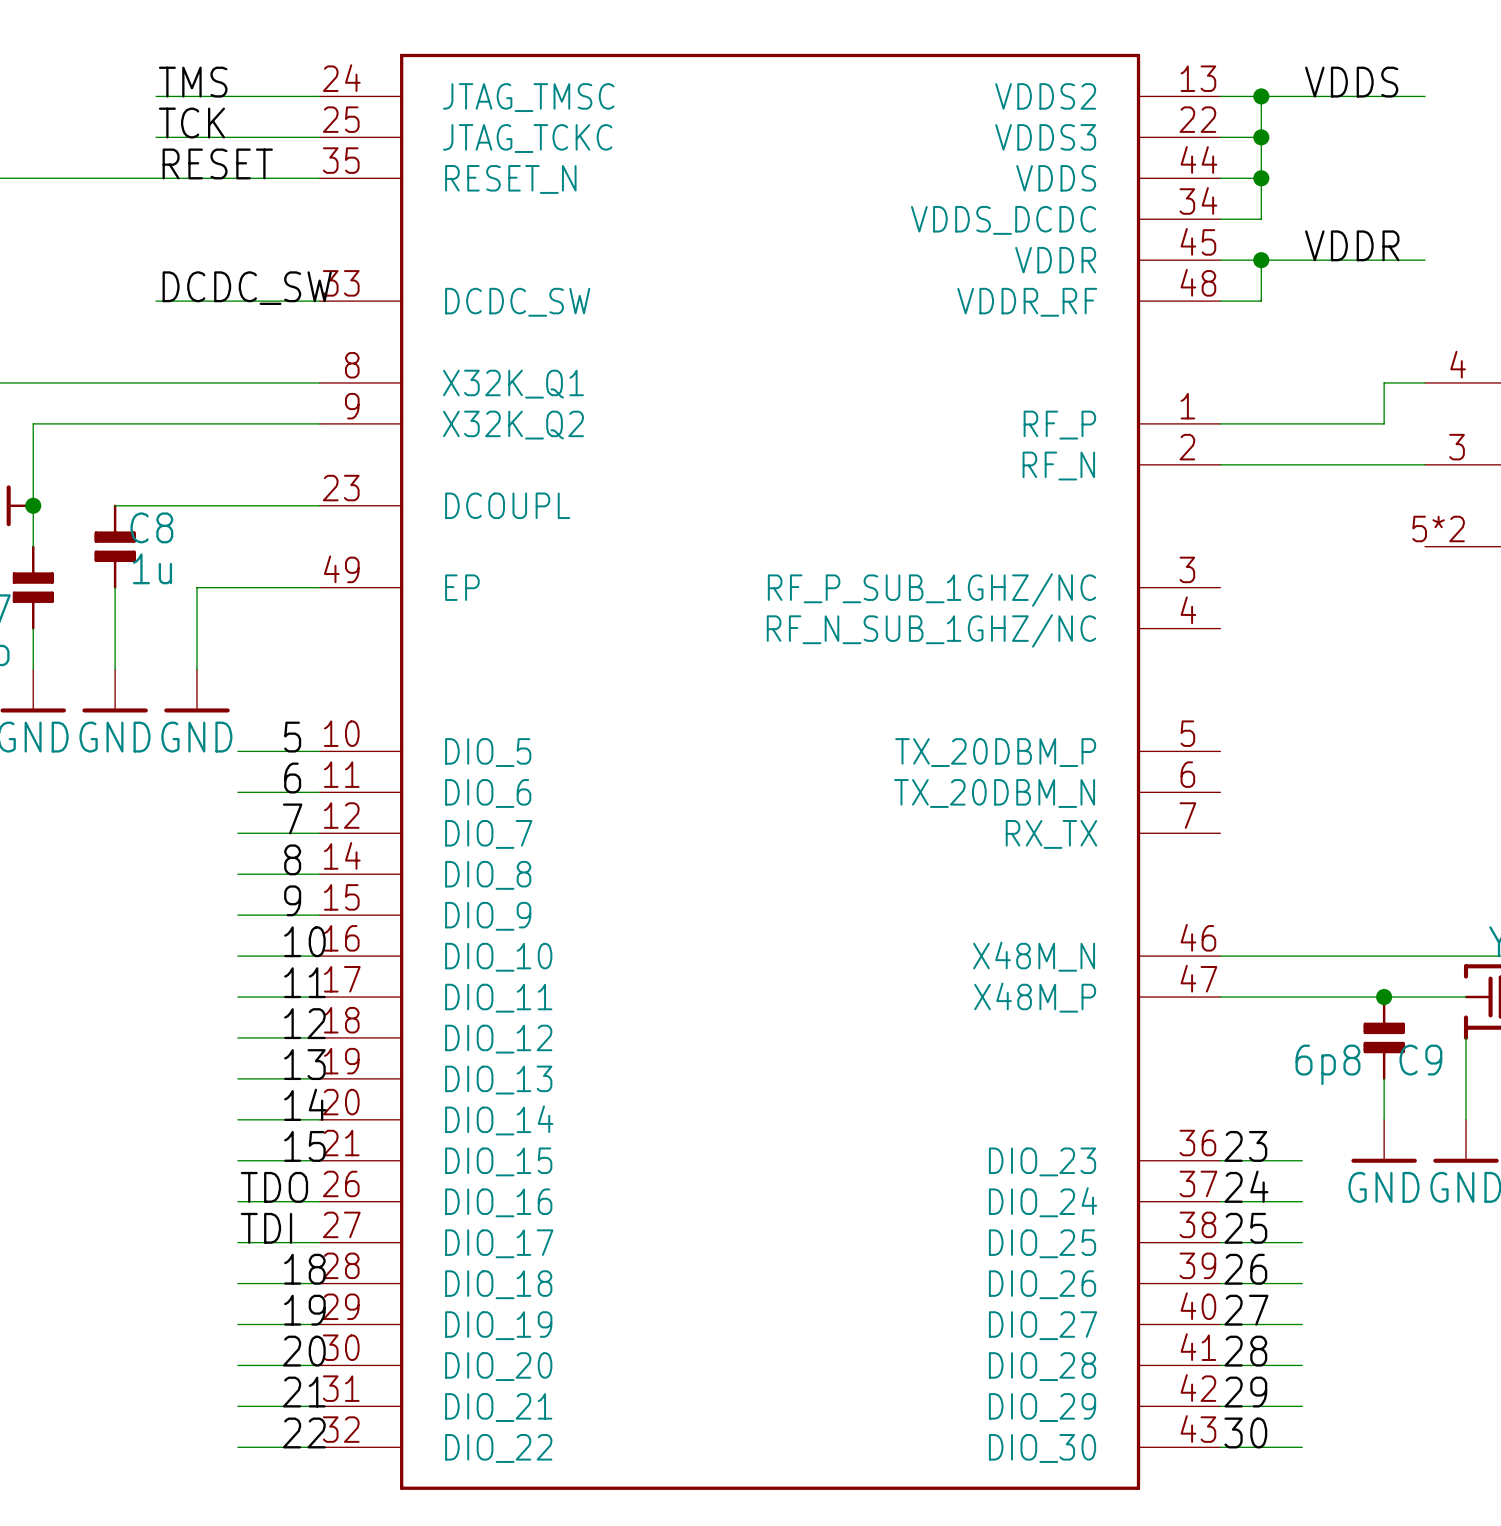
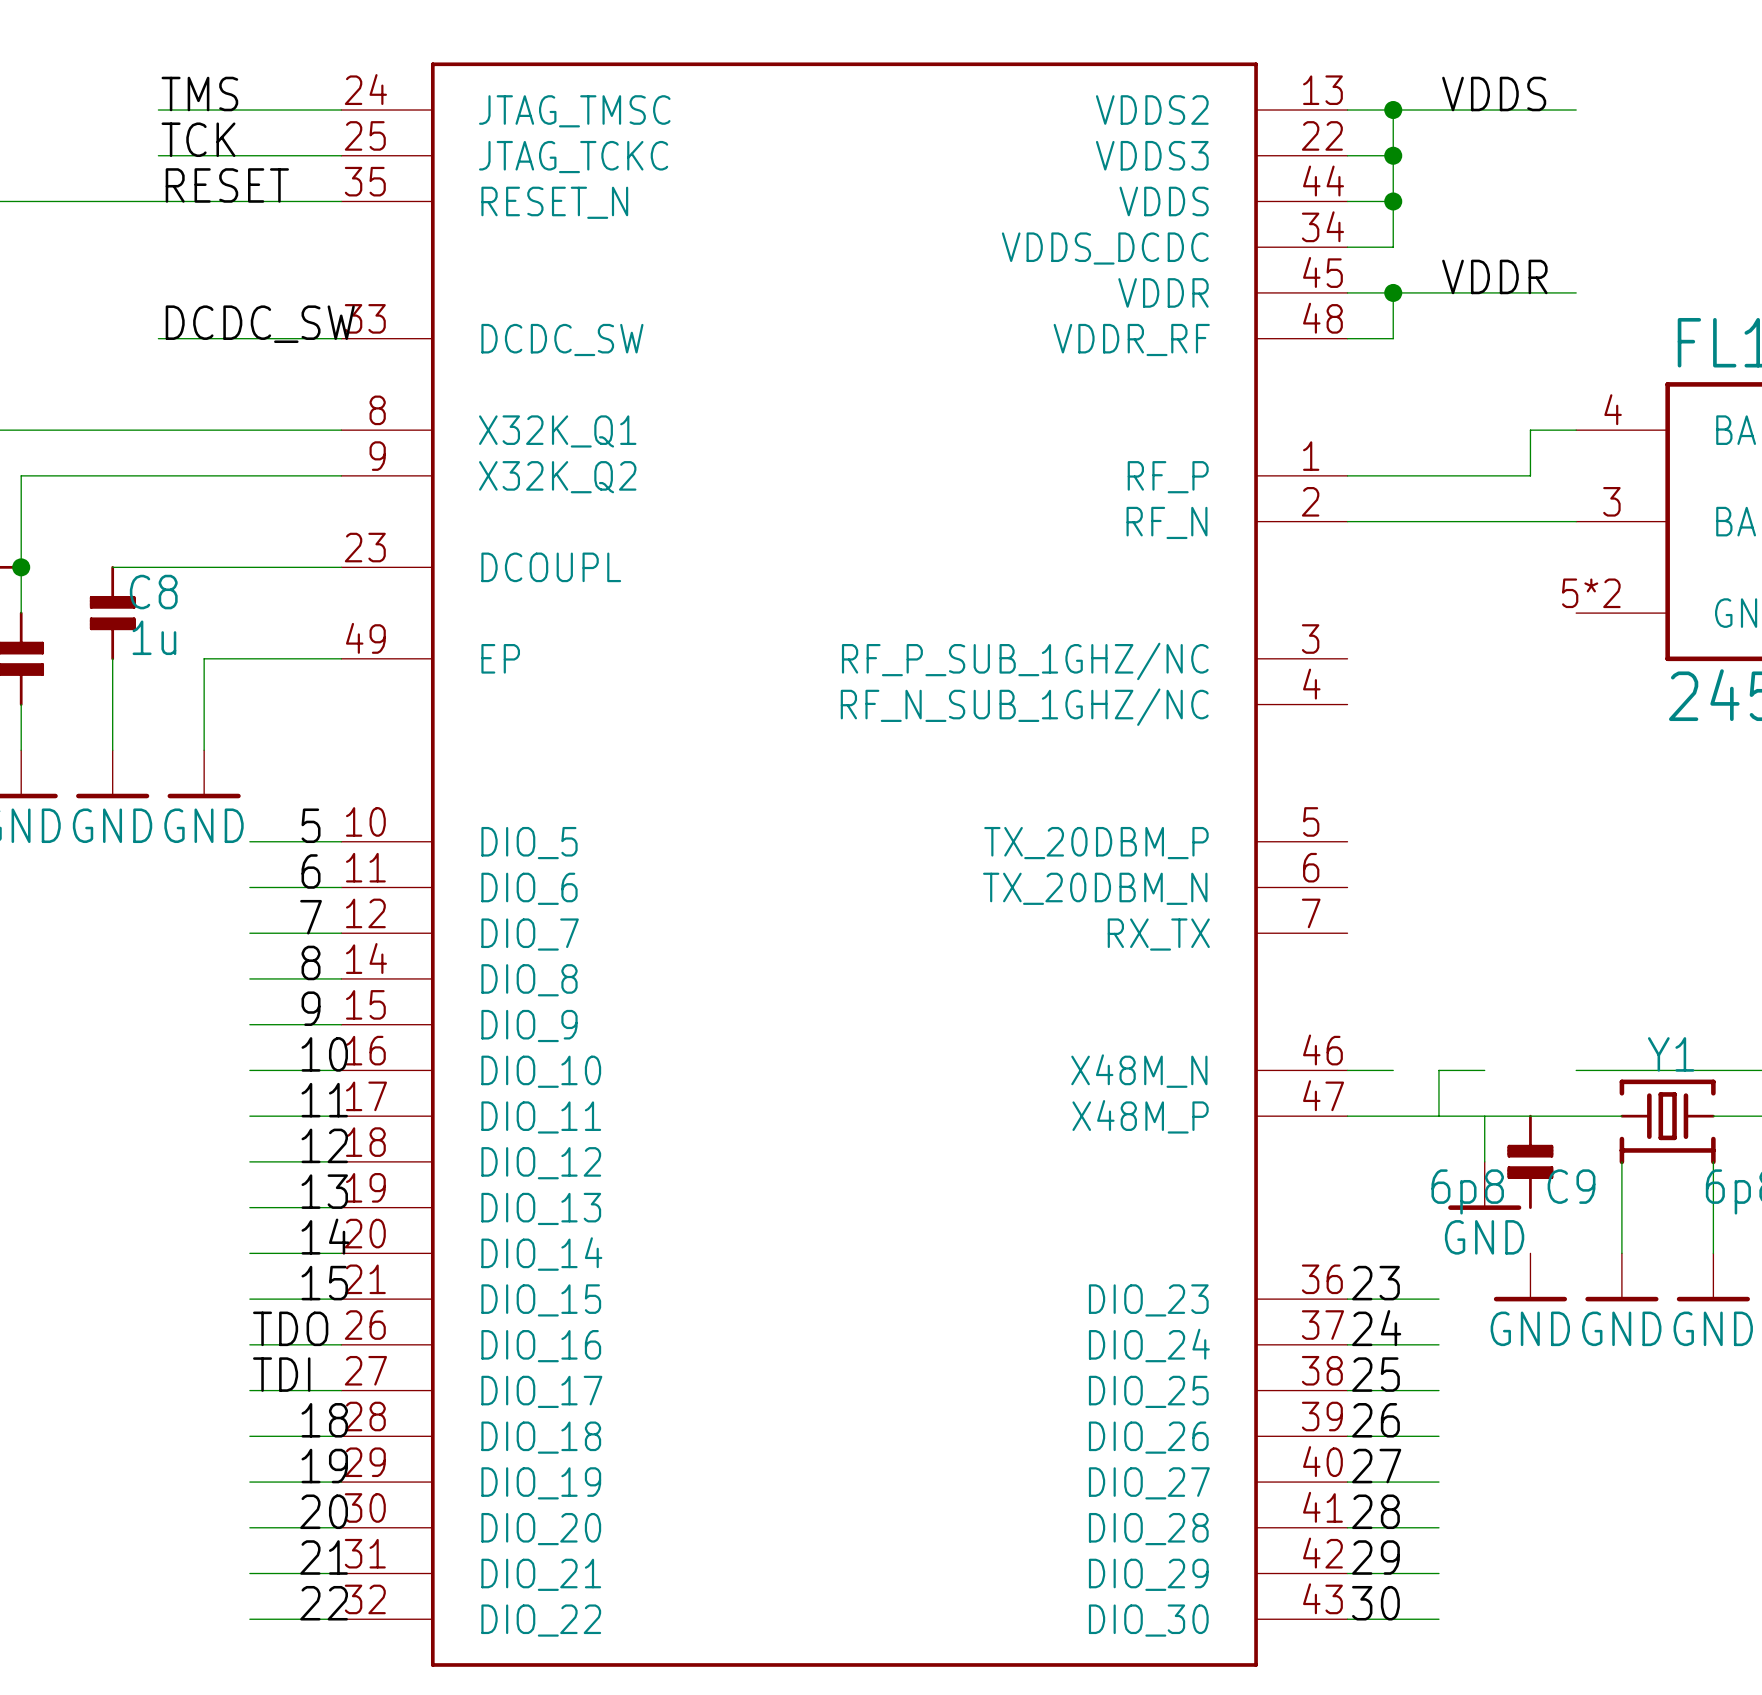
wire: (1261, 956) (1302, 956) -> (1438, 1116) (1438, 1070)
wire: (1343, 956) (1425, 956) -> none
junction: (1384, 997) -> none
power symbol: none -> GND (1484, 1185)
wire: (1384, 1078) (1384, 1119) -> (1484, 1116) (1484, 1161)

